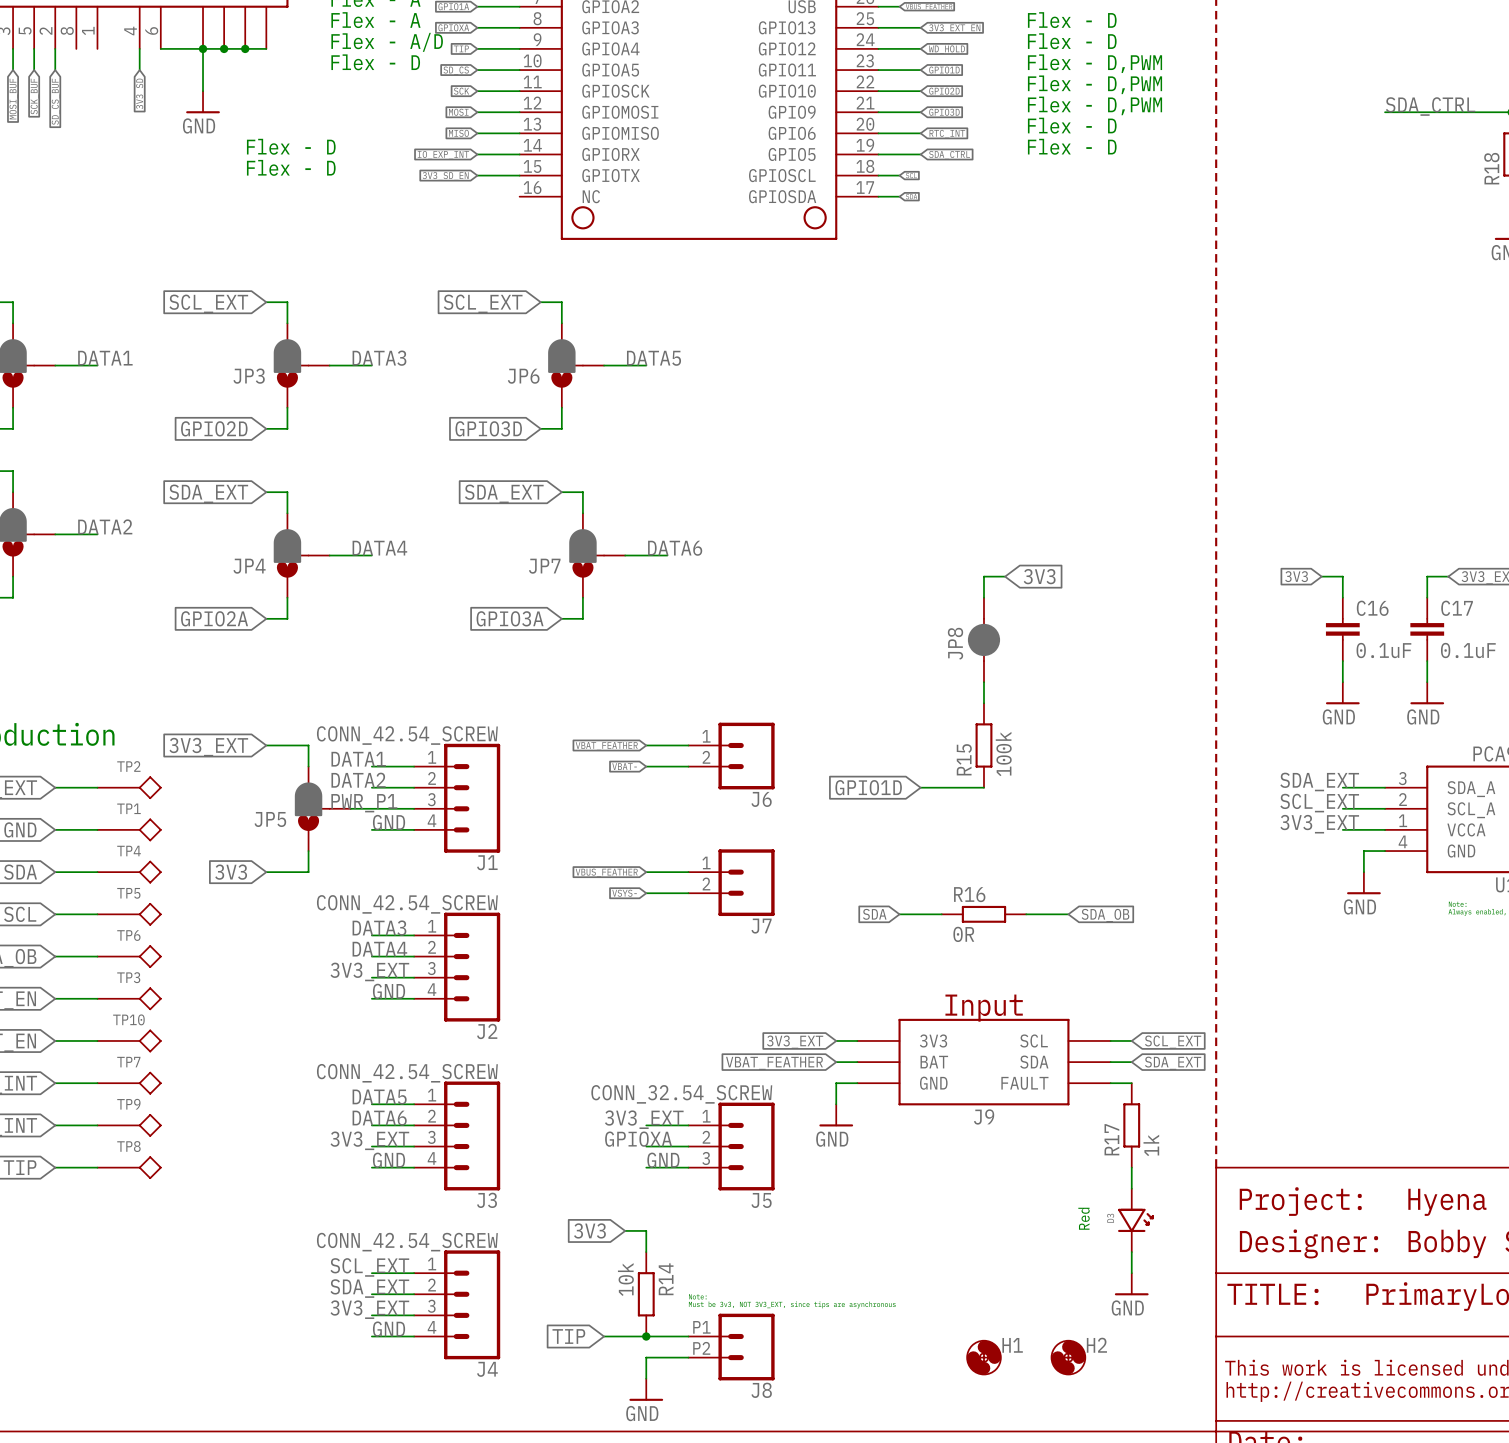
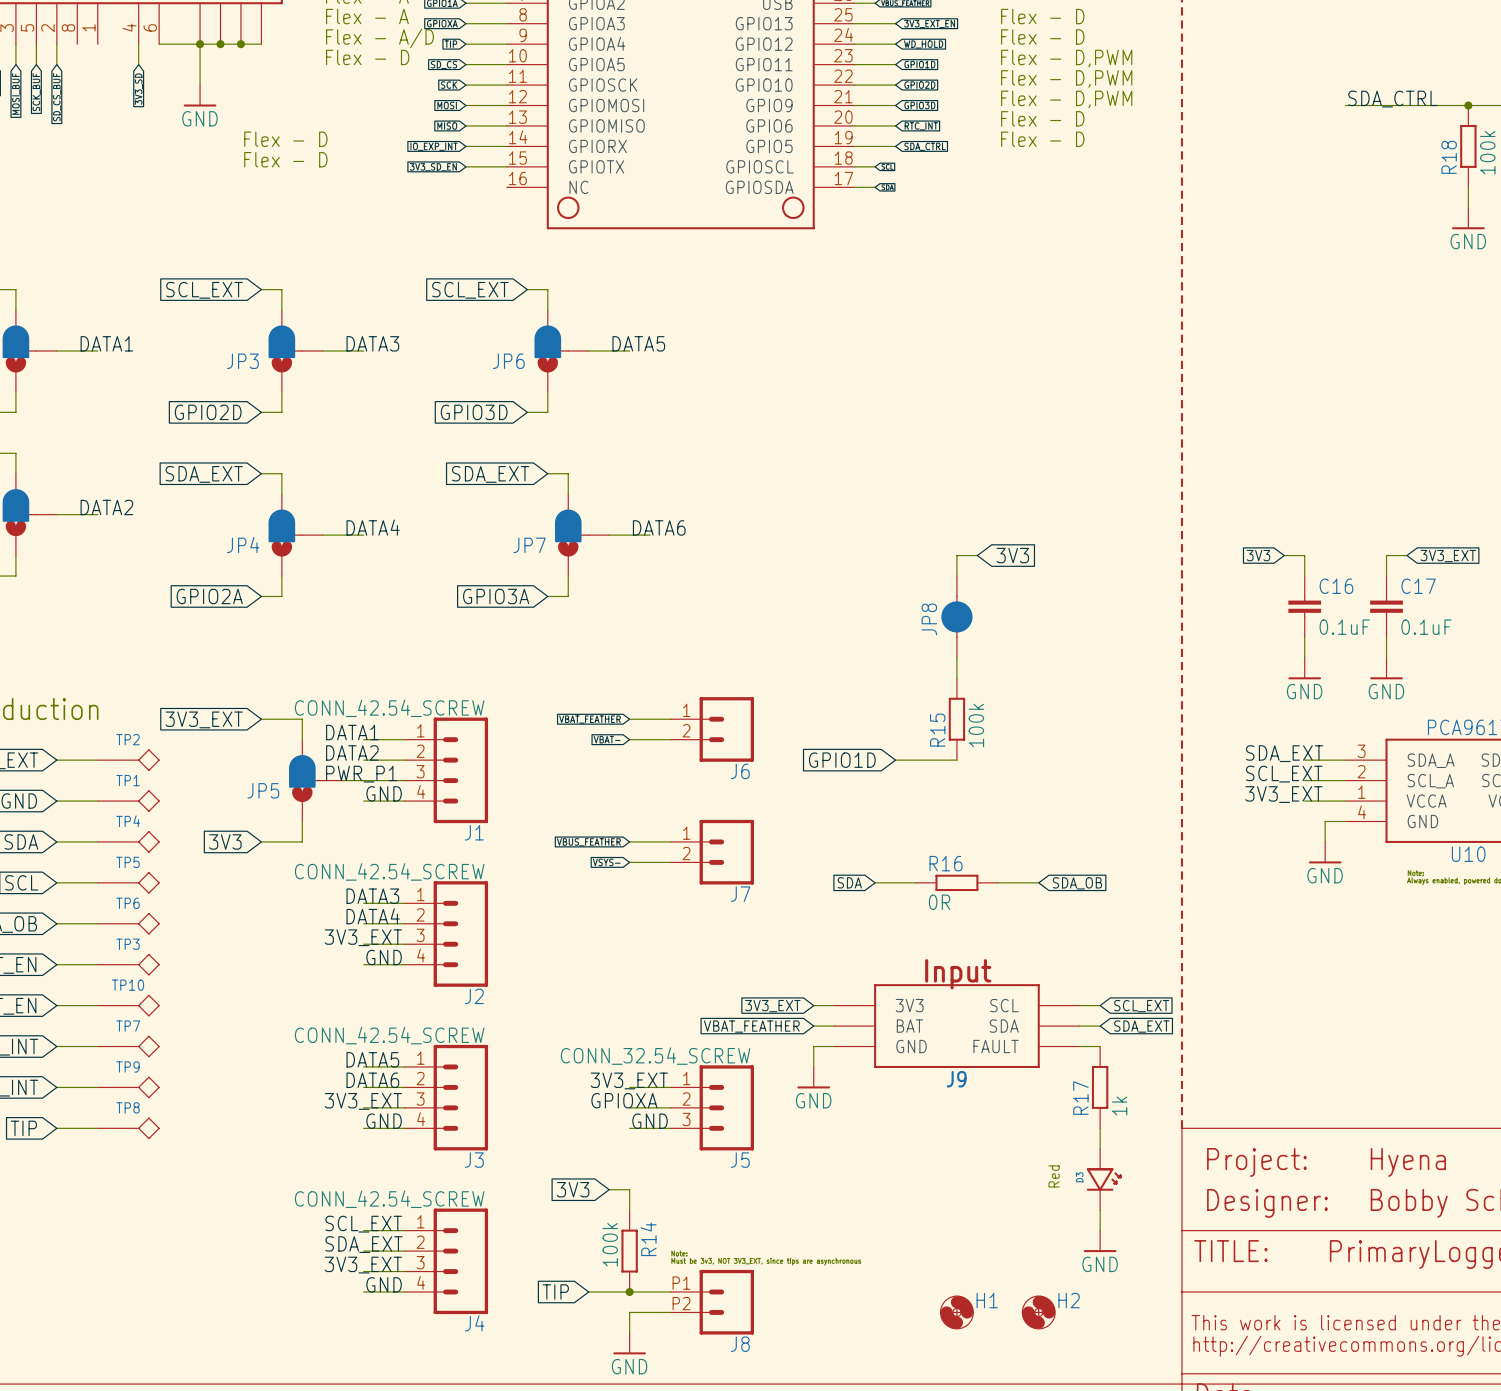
R14 value: 10k (625, 1279) -> 100k (610, 1244)

